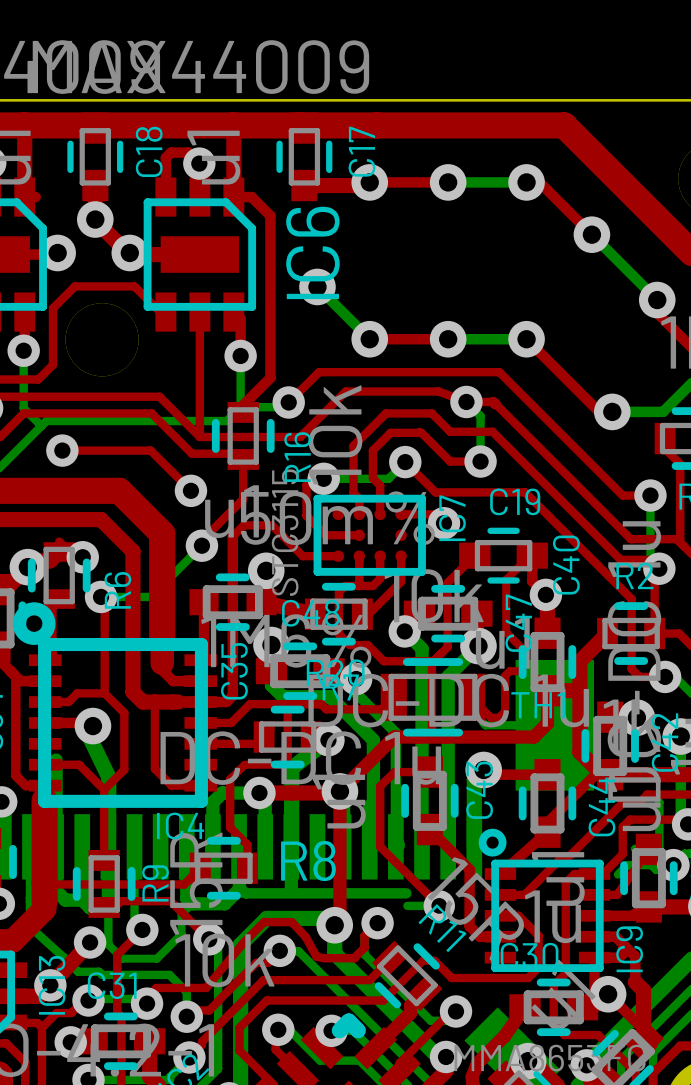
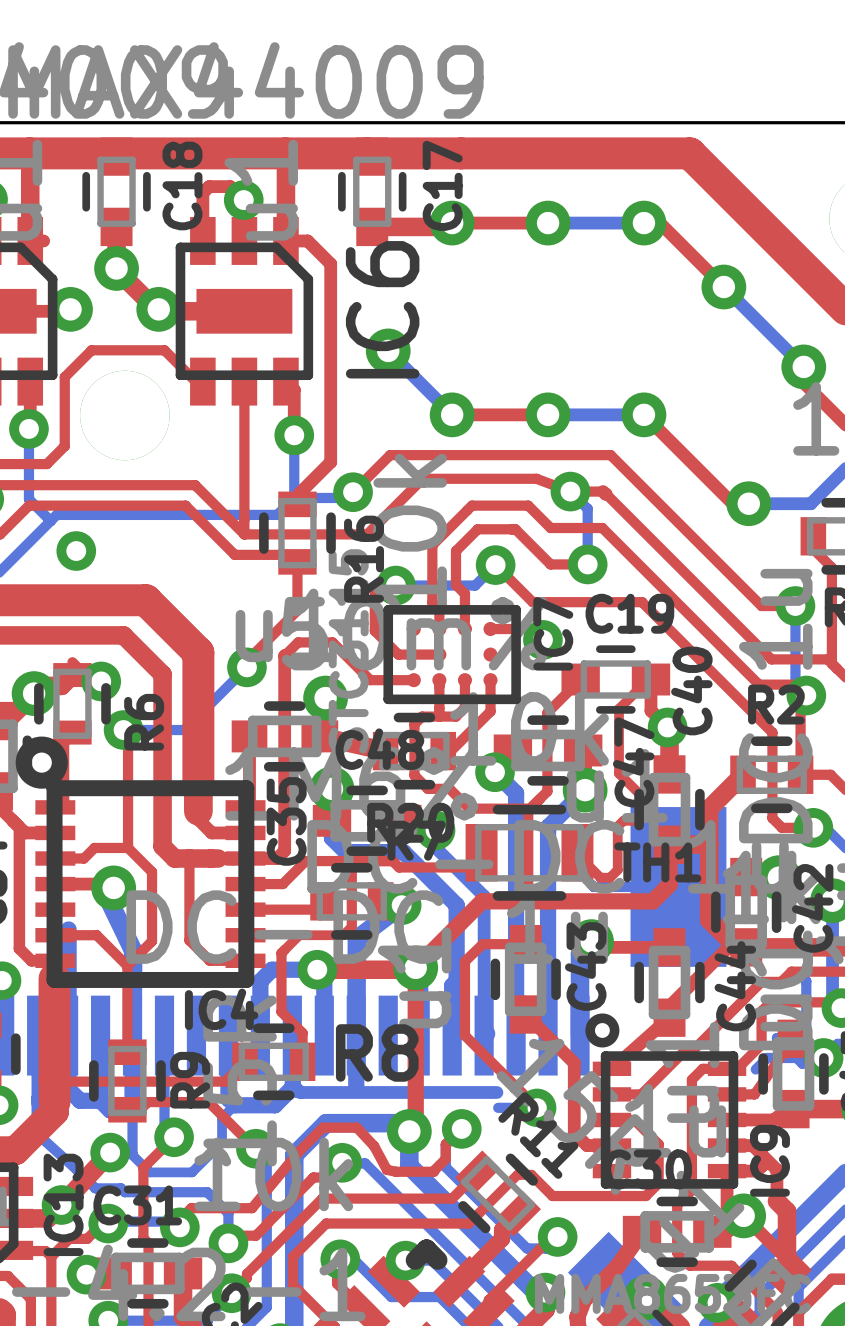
top track: (62, 450) (150, 450) (190, 490) -> none
via: (190, 490) -> none

